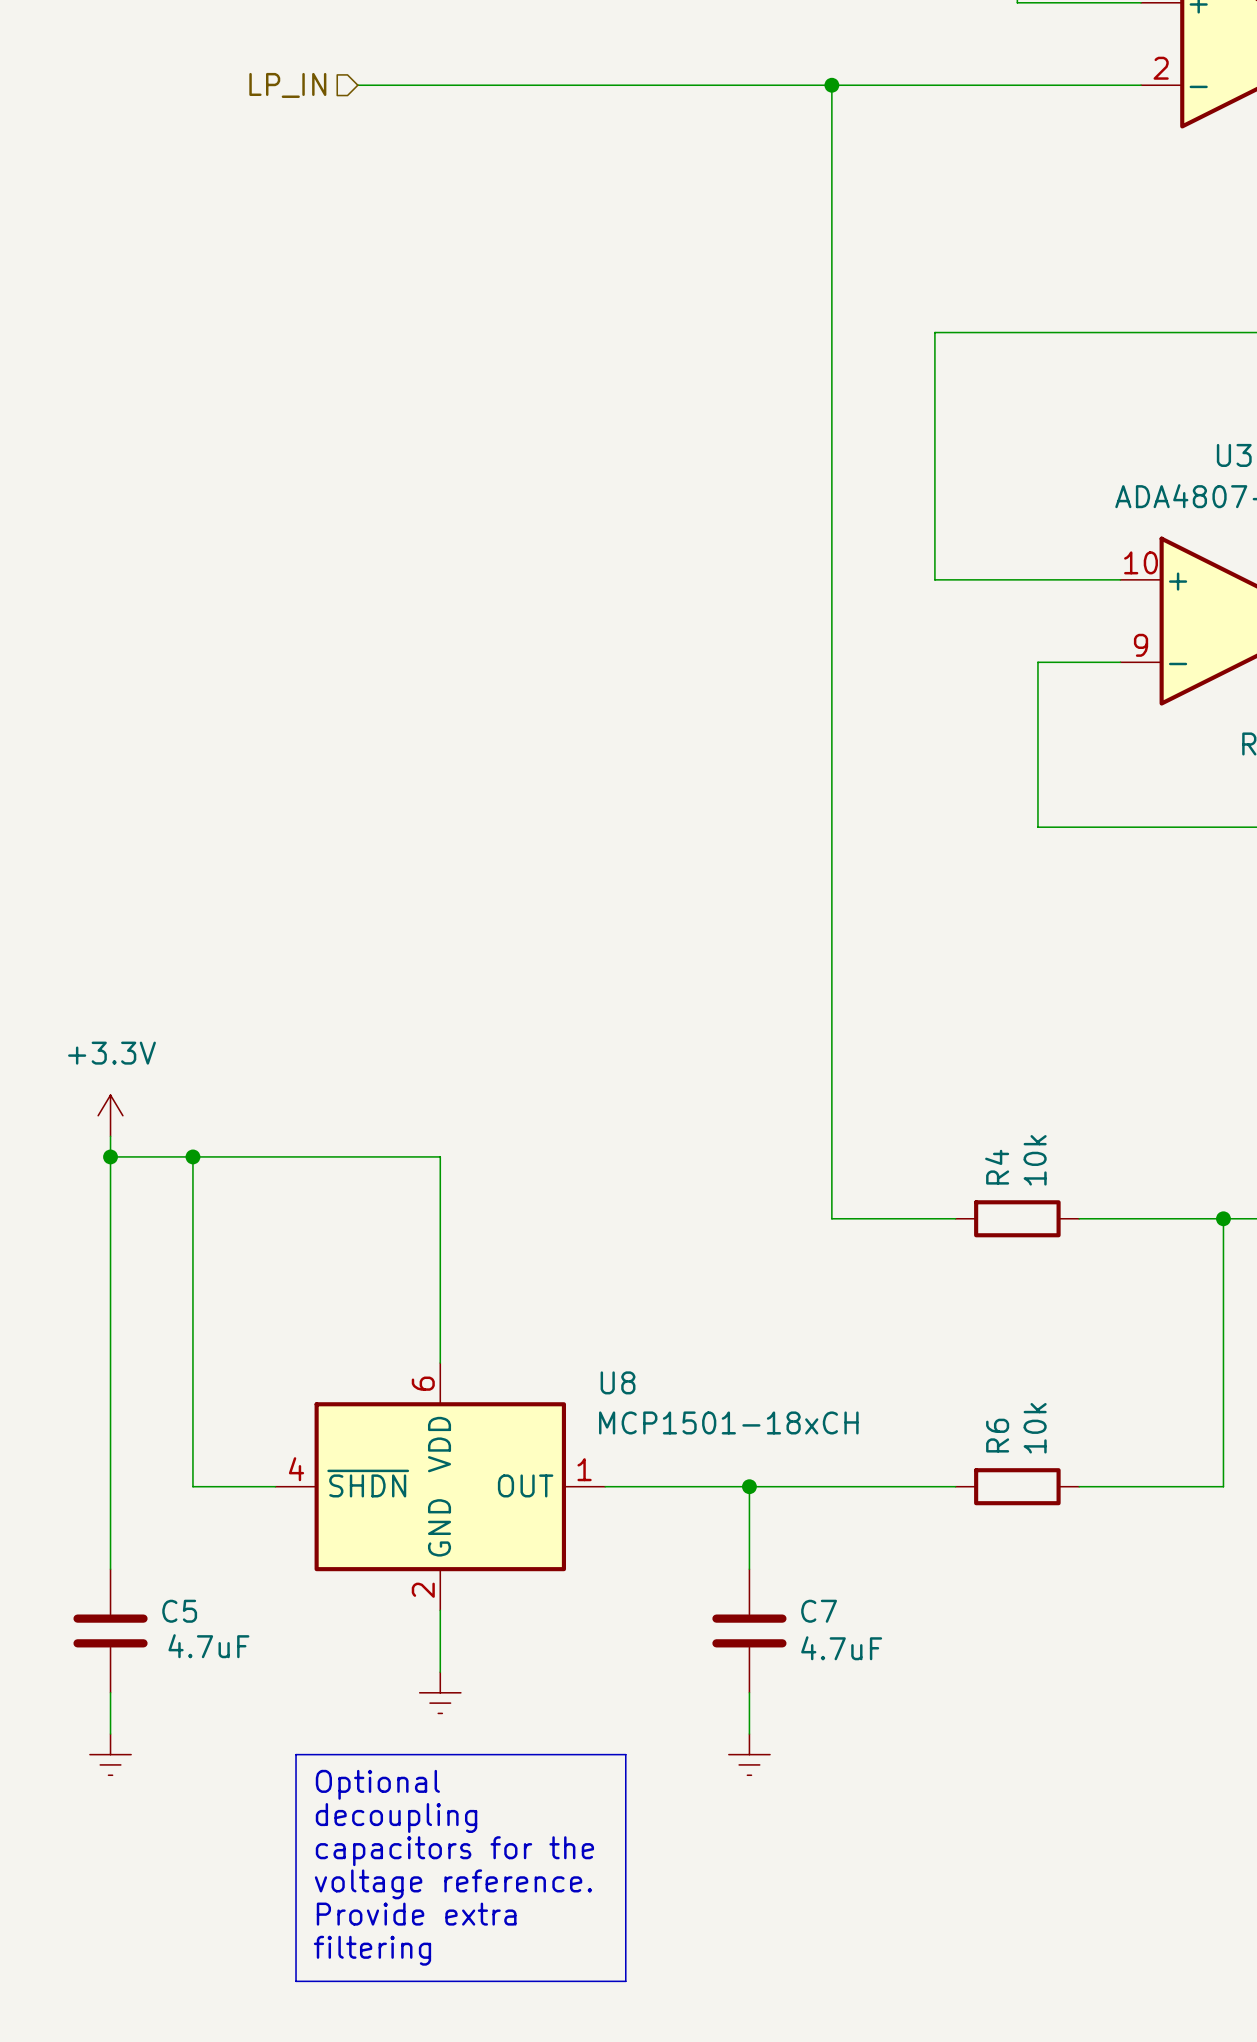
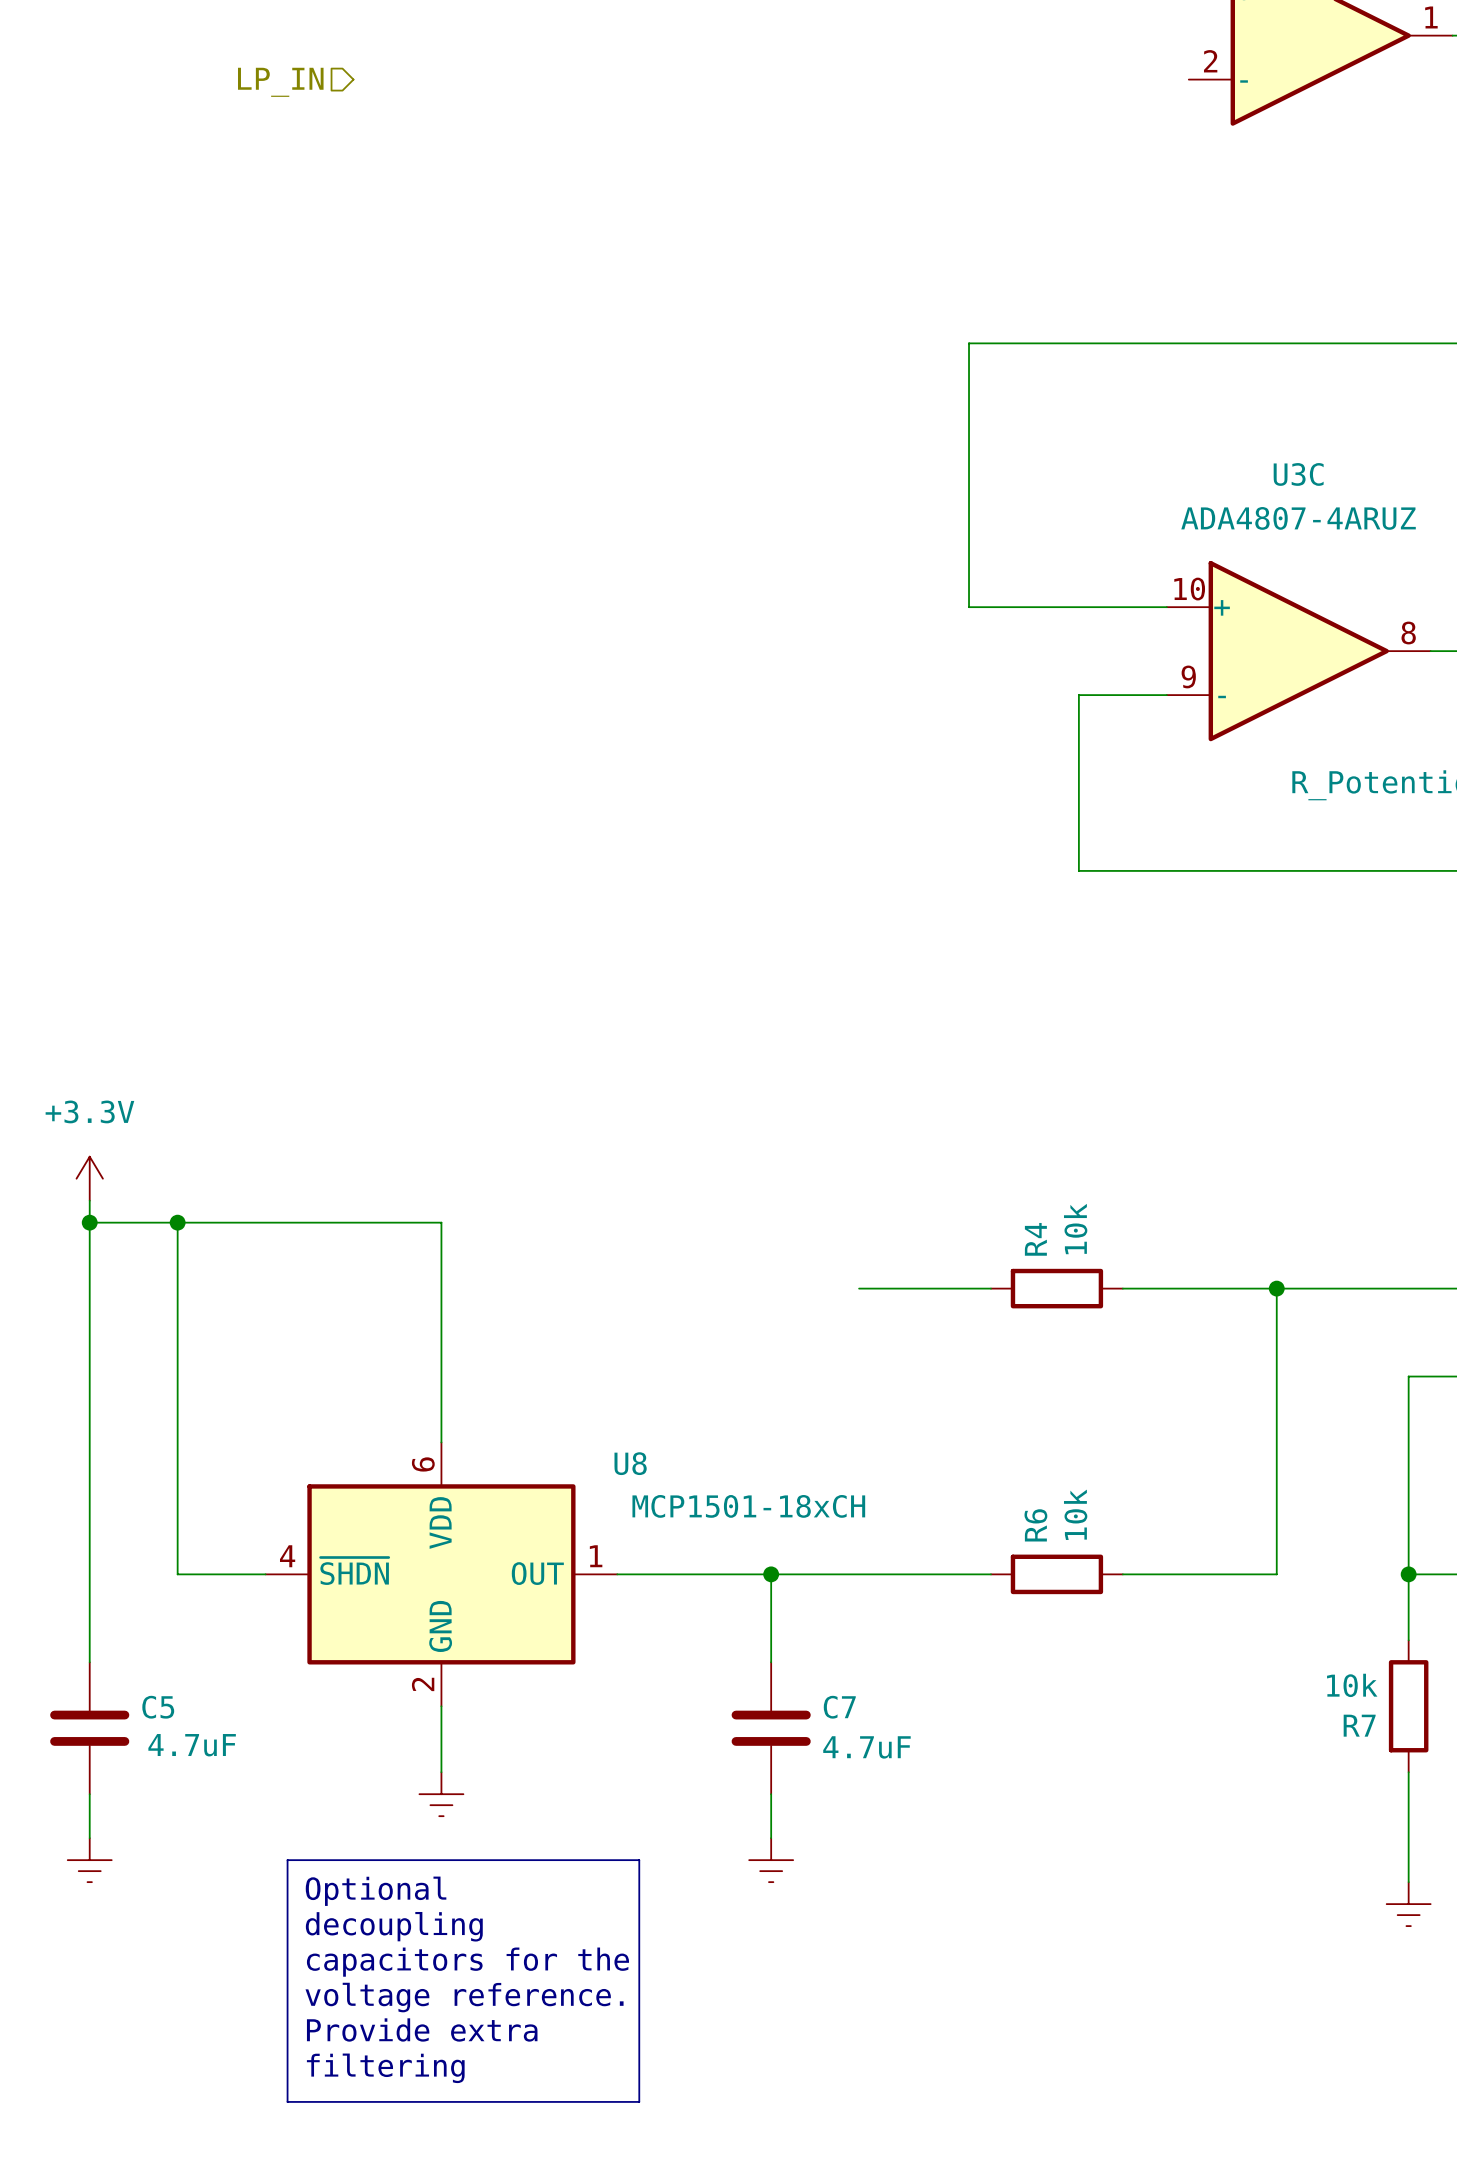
wire: (357, 85) (1141, 85) -> none
wire: (831, 85) (831, 1218) -> none
junction: (831, 85) -> none

